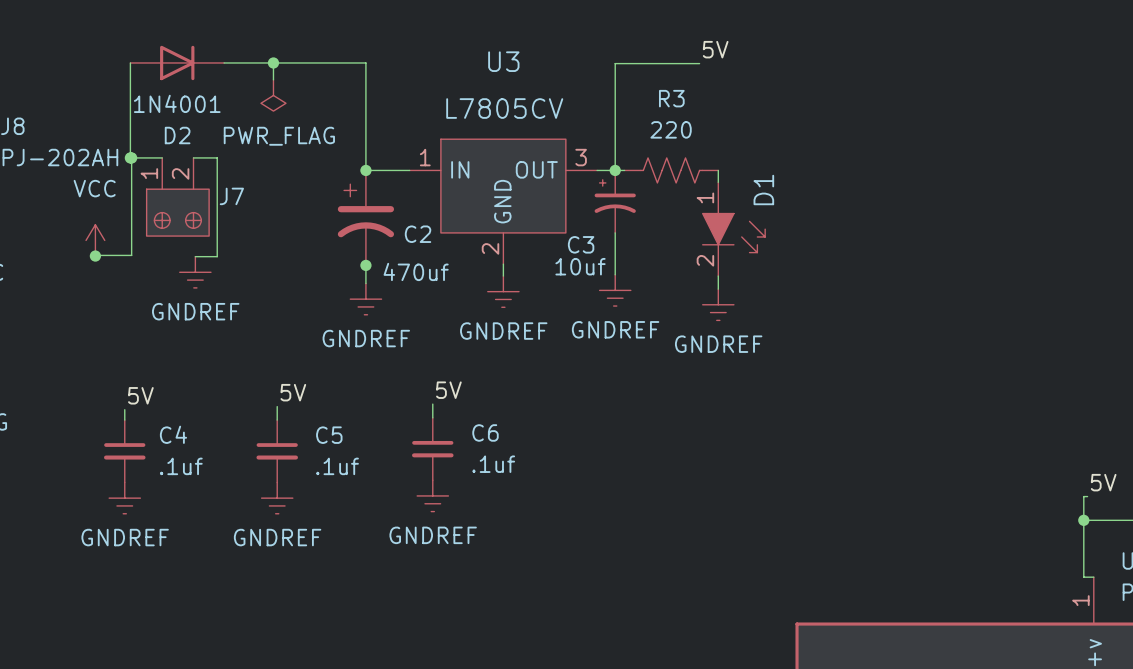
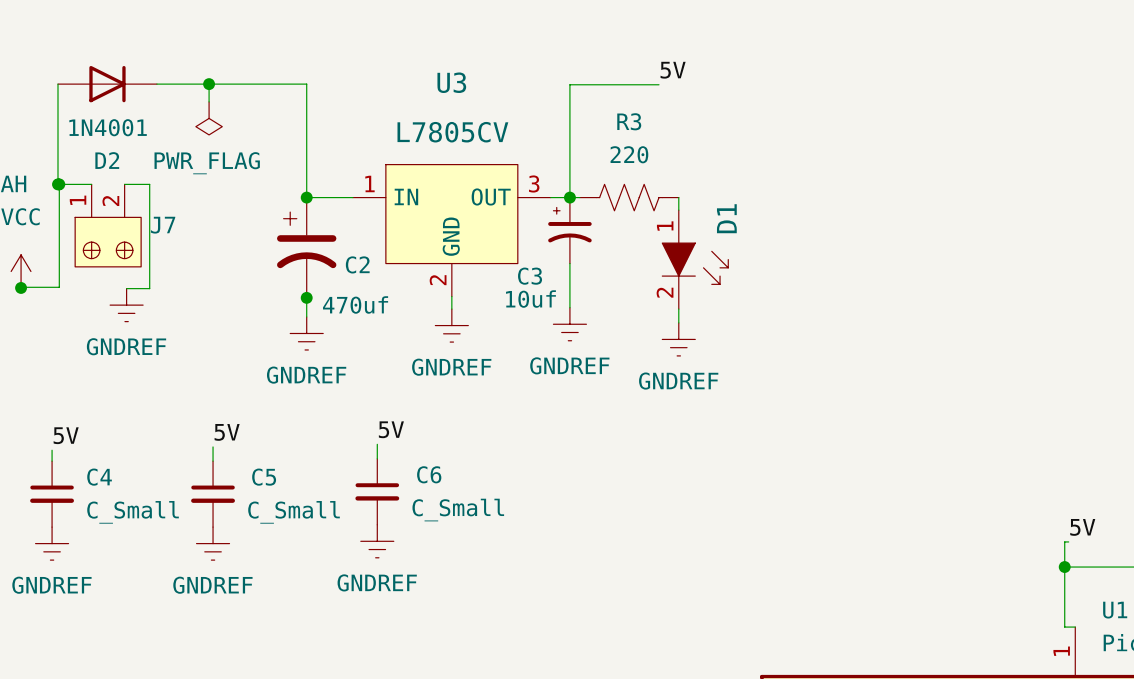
C6 value: .1uf (493, 464) -> C_Small (458, 510)
C4 value: .1uf (181, 466) -> C_Small (133, 512)
C5 value: .1uf (337, 466) -> C_Small (294, 512)

